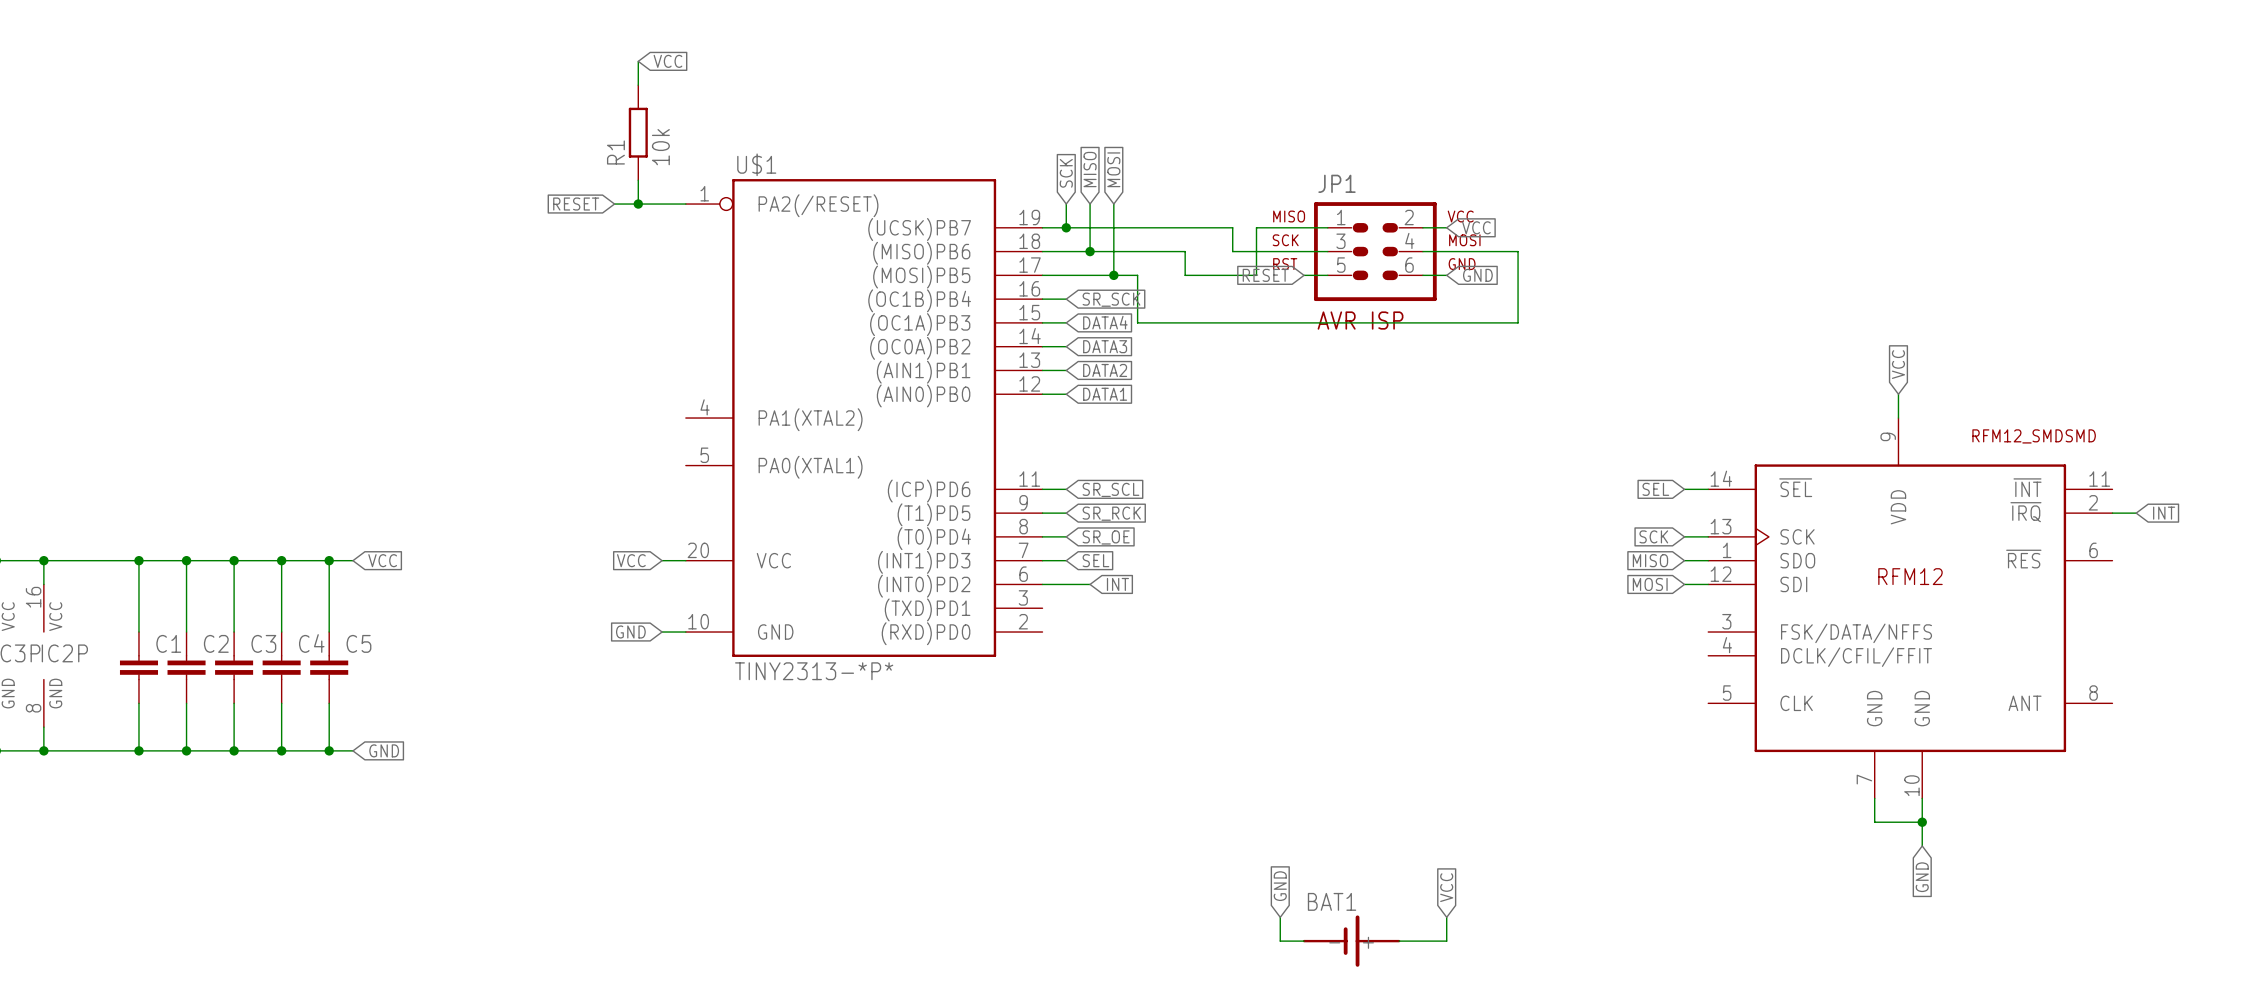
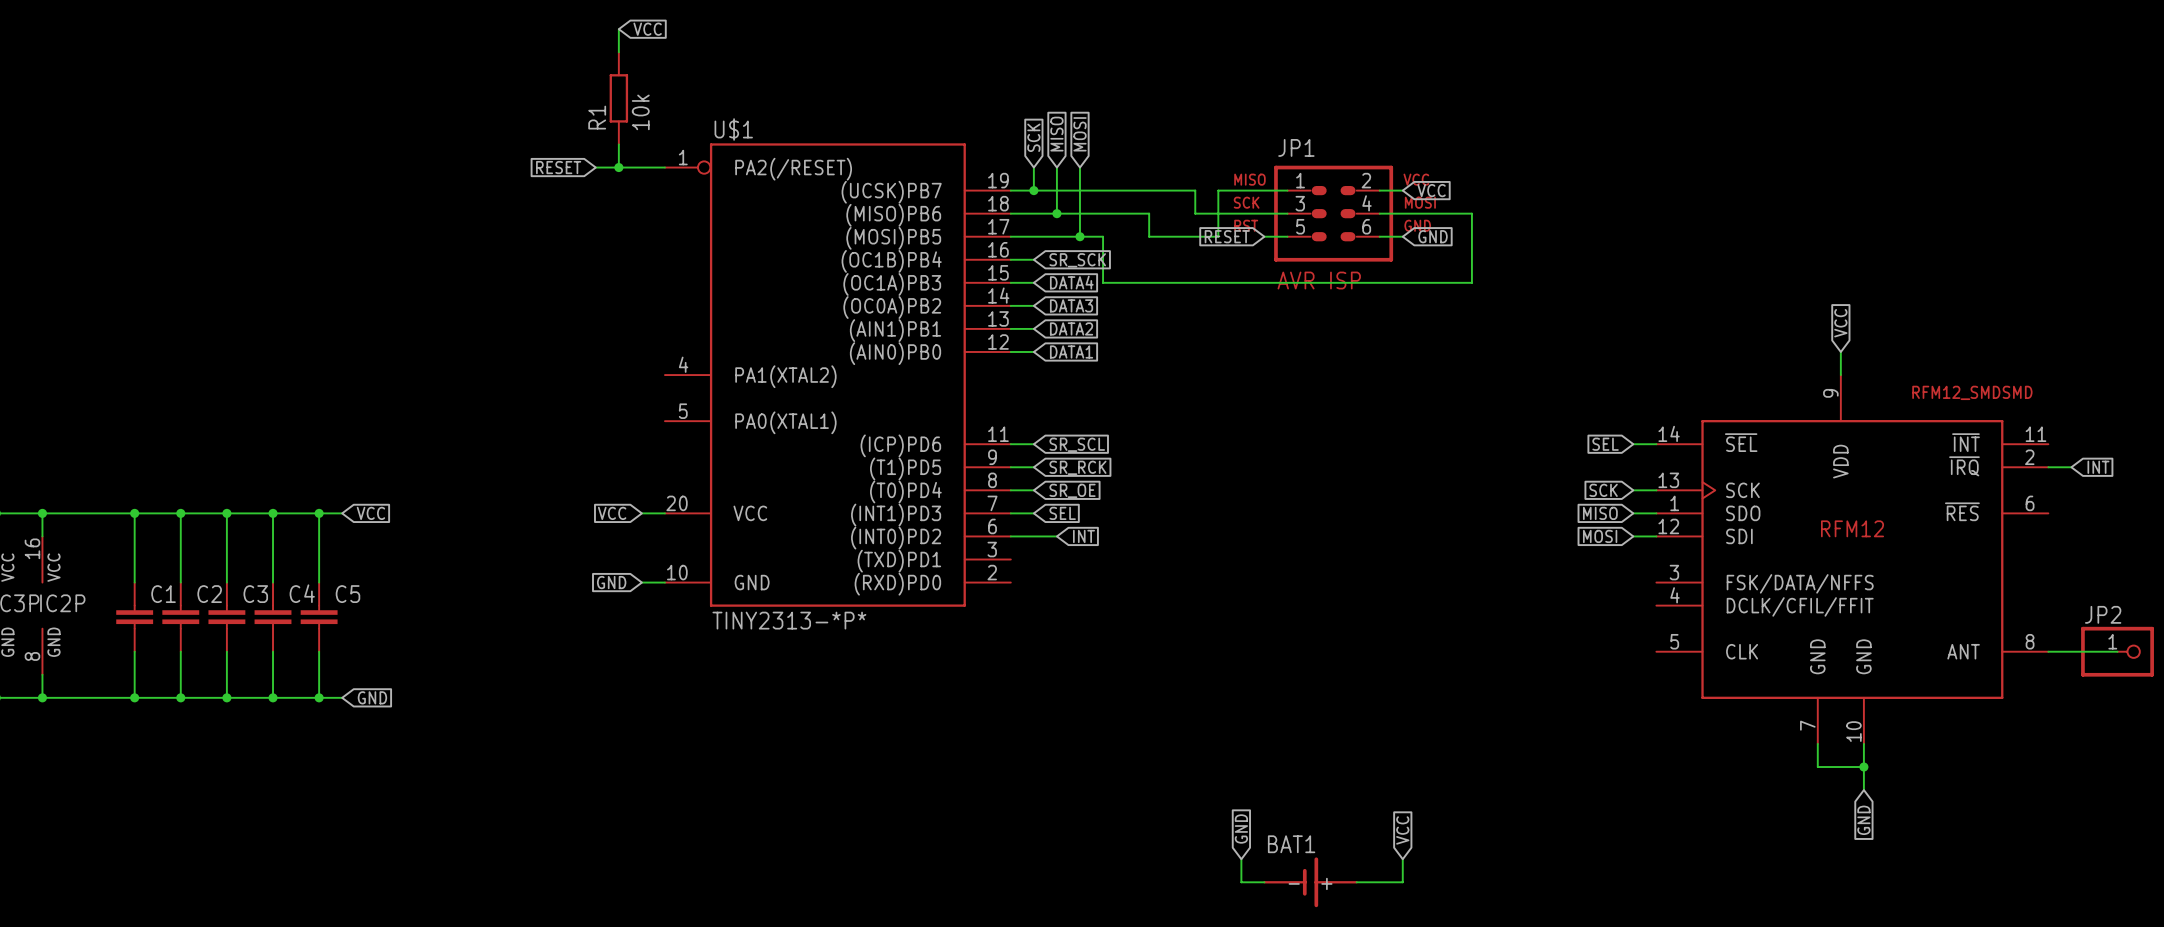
wire: none -> (2048, 651) (2117, 651)
JP2: none -> (2117, 651)

